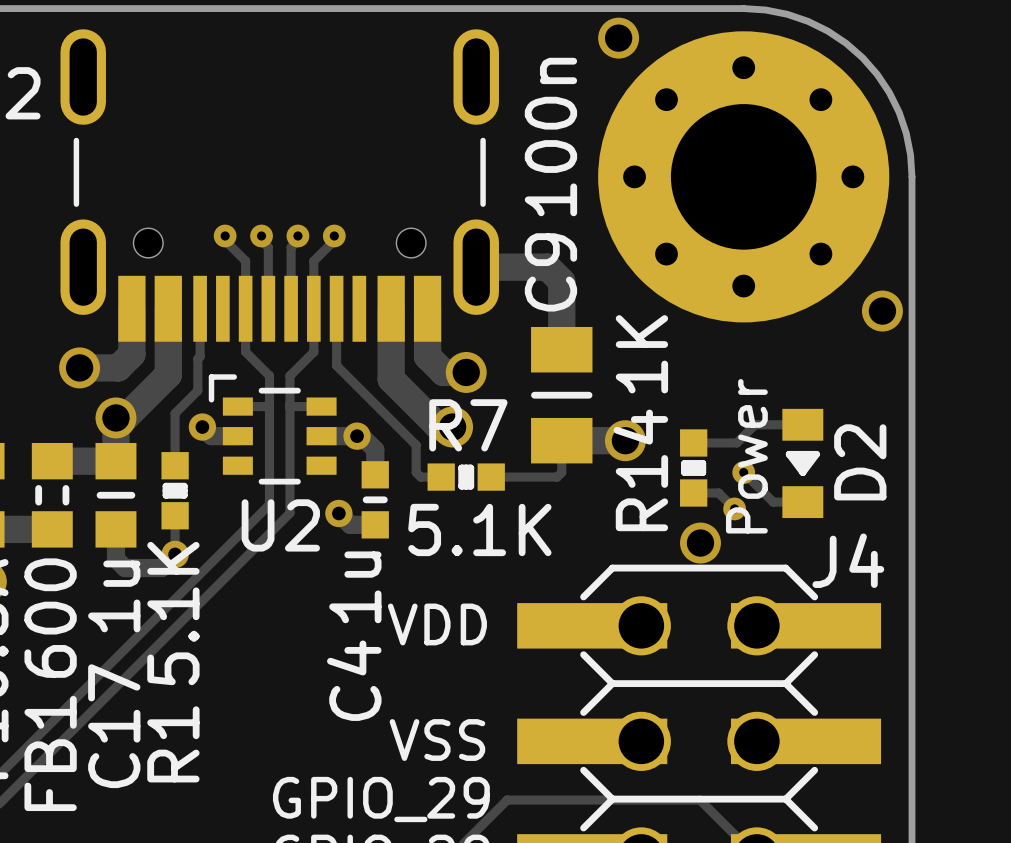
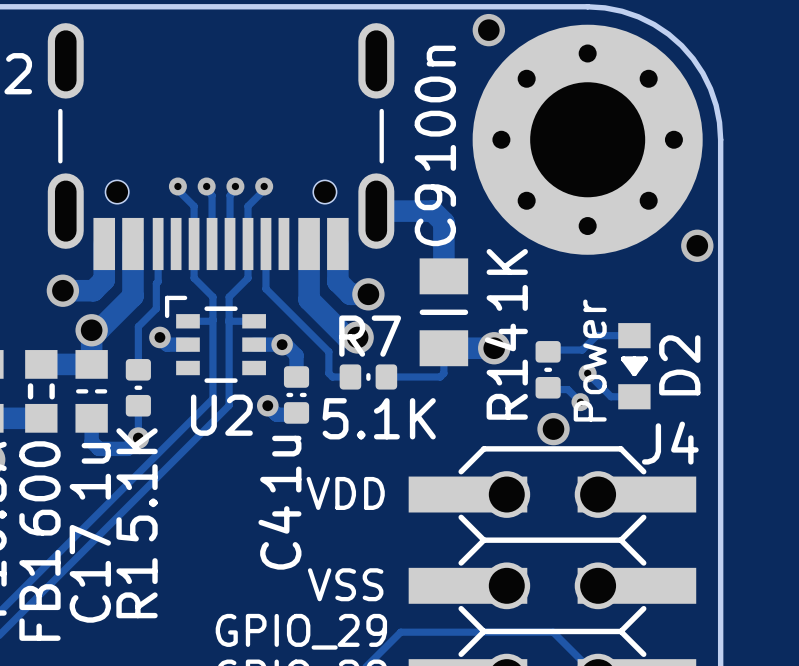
R14 footprint: [680, 429, 708, 507] -> [535, 341, 561, 399]
C17 footprint: [95, 442, 137, 548] -> [75, 350, 108, 433]
R1 footprint: [161, 452, 189, 530] -> [125, 359, 151, 417]
C4 footprint: [361, 461, 389, 539] -> [283, 366, 310, 424]
R7 footprint: [427, 463, 505, 491] -> [339, 364, 398, 390]

